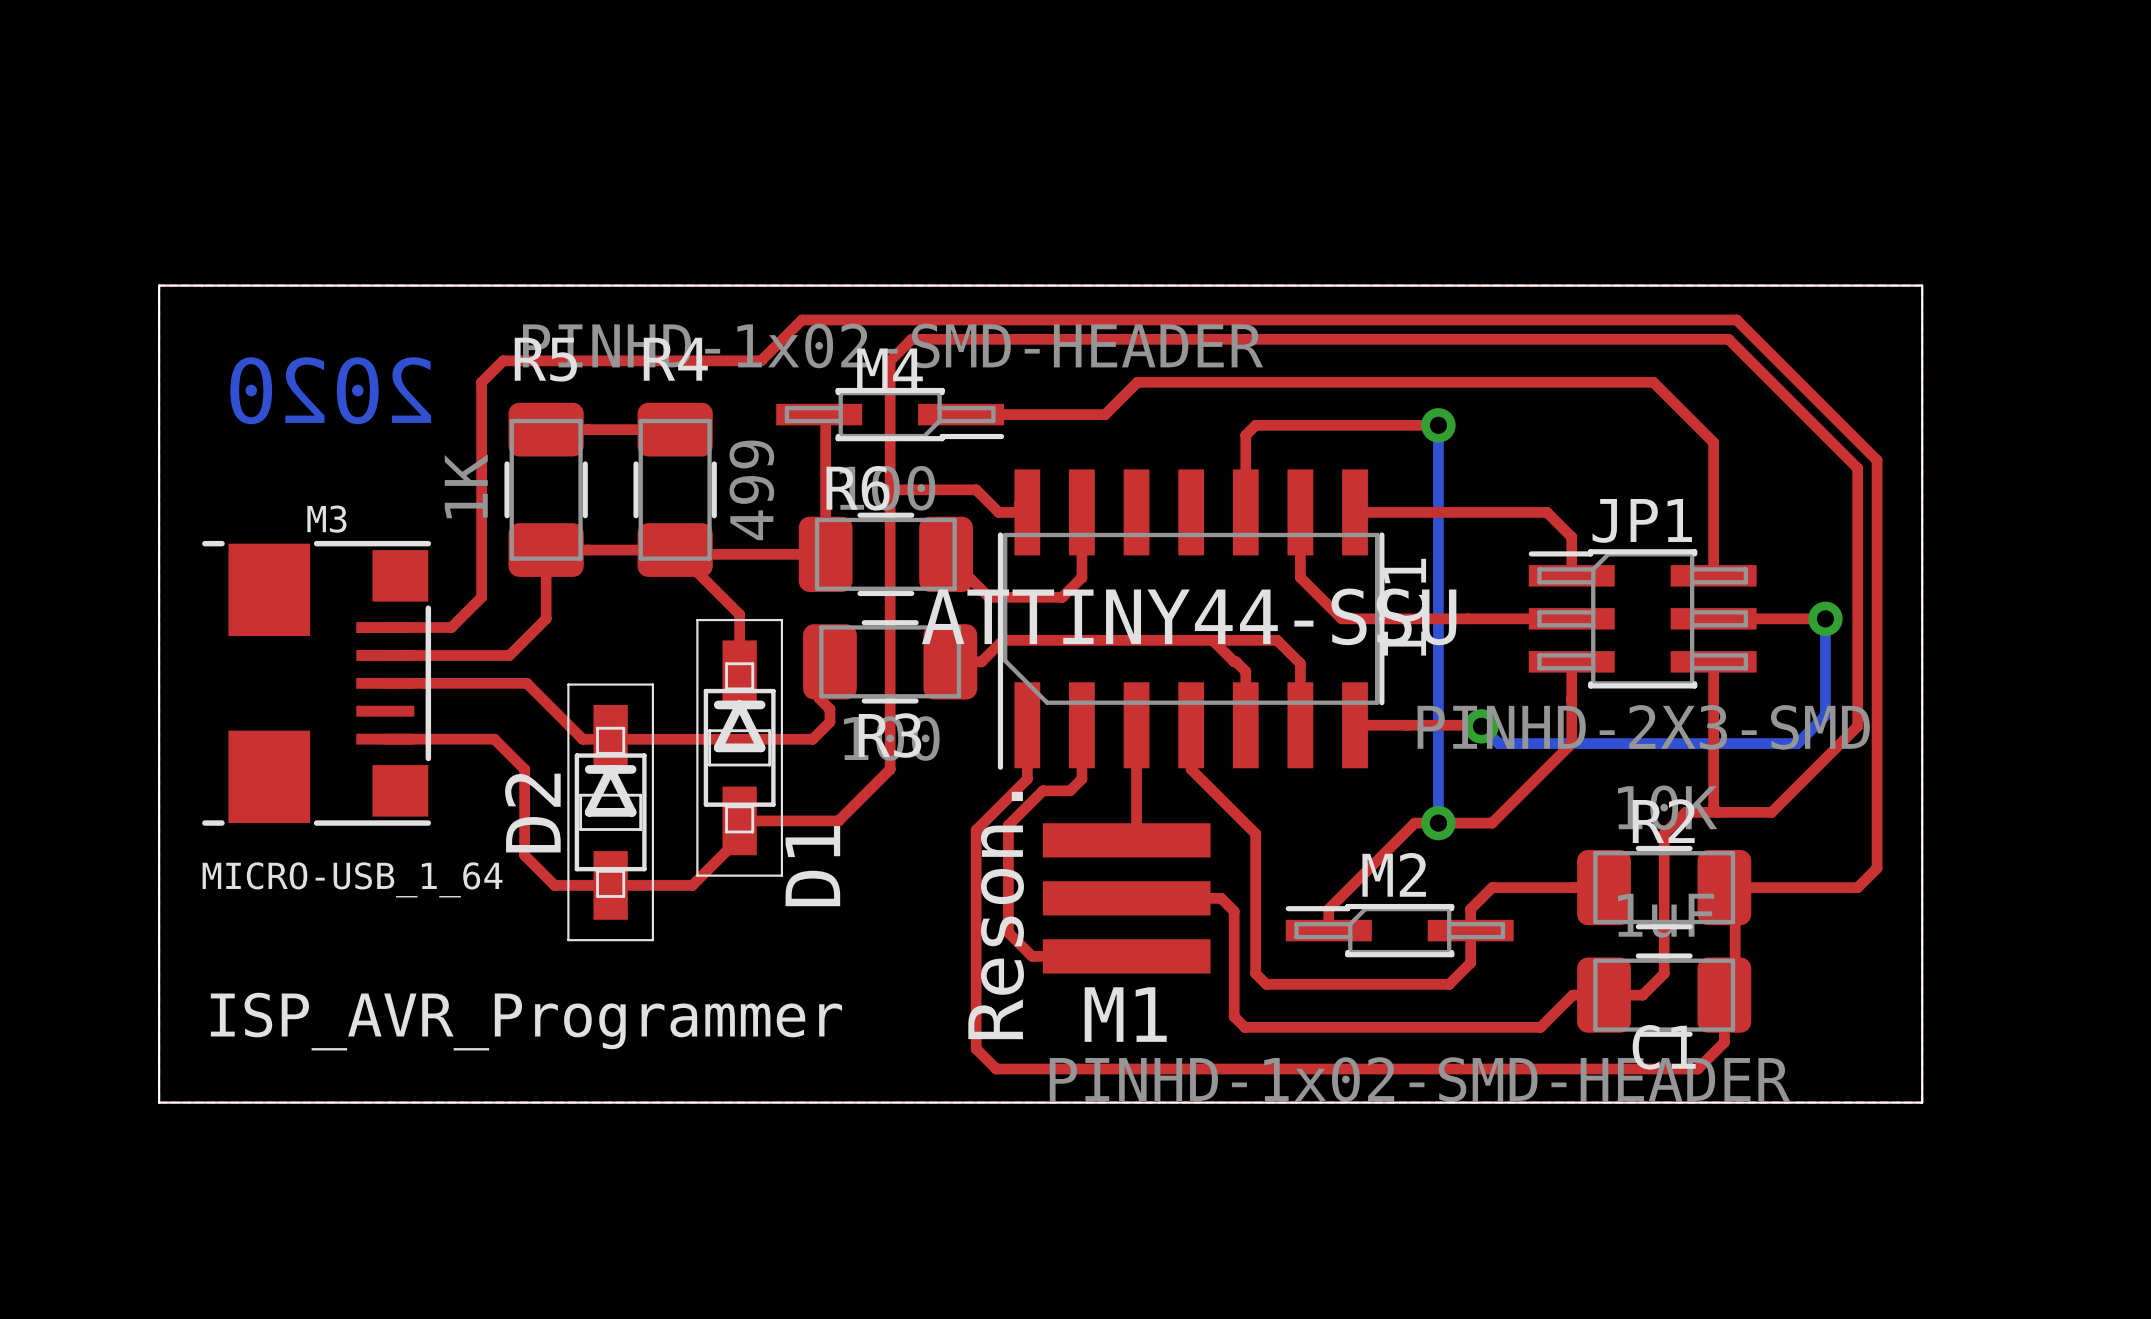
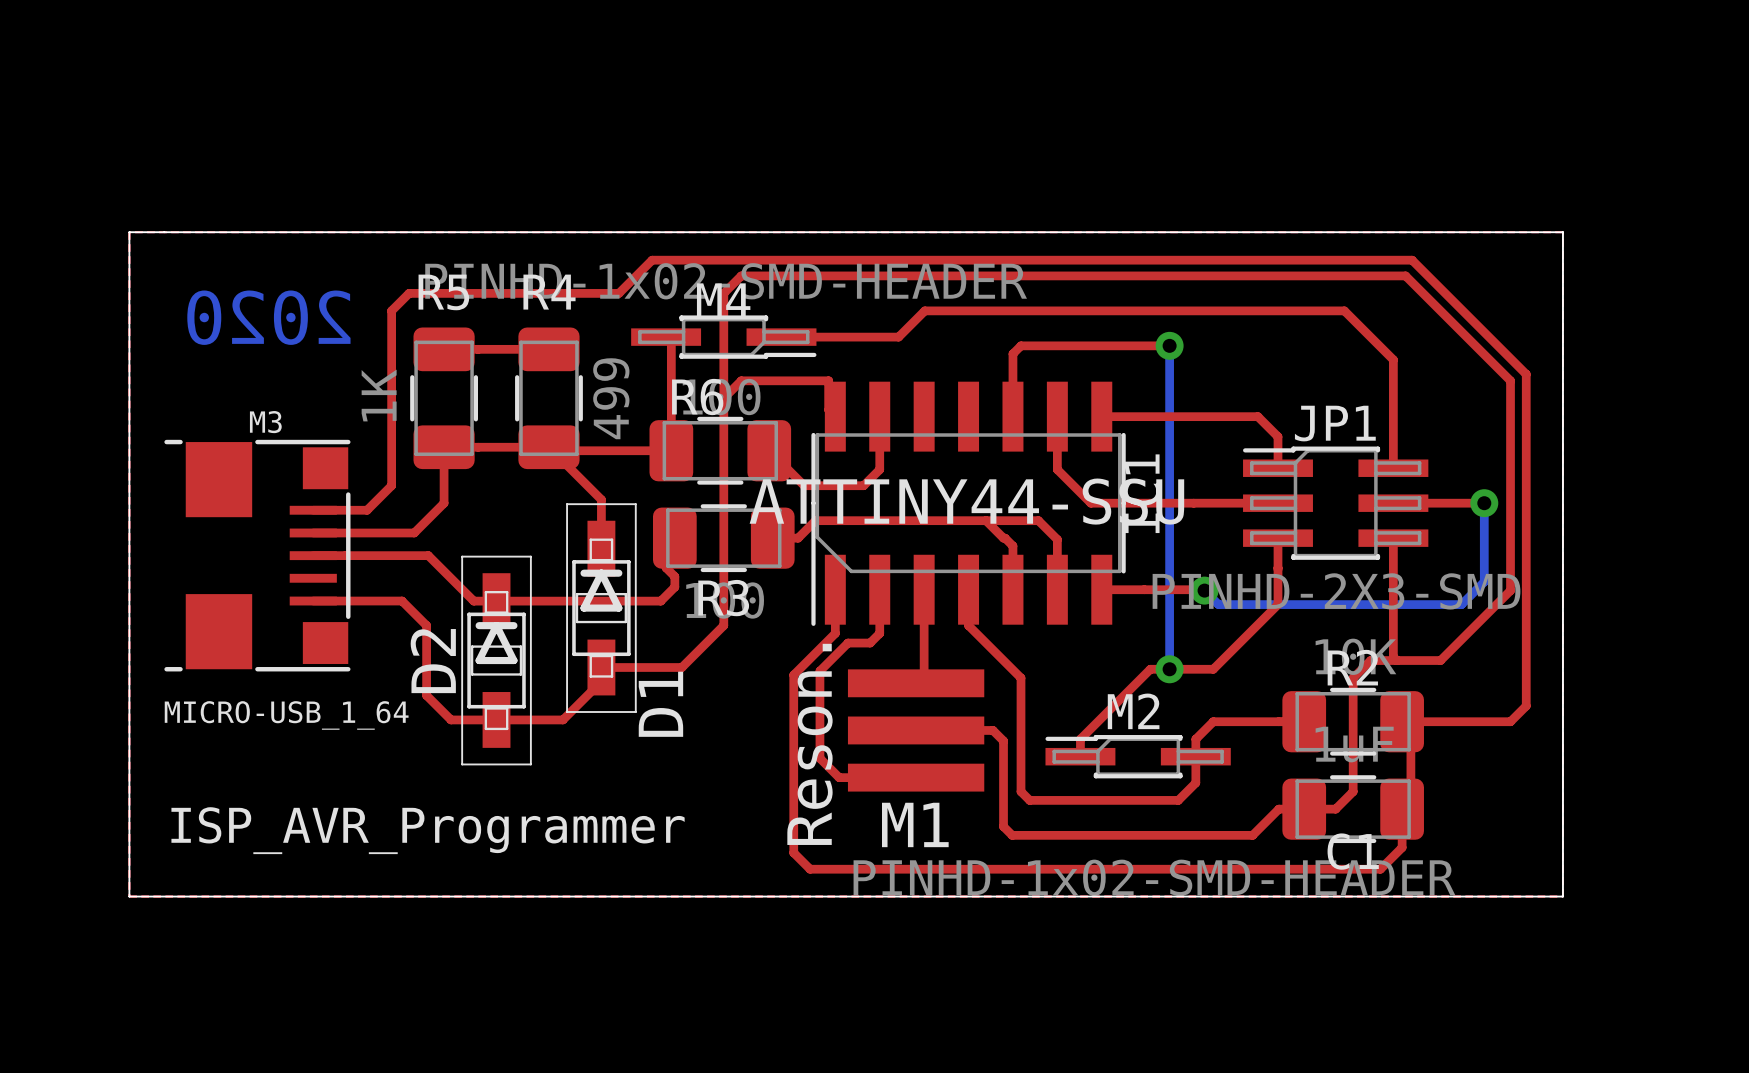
top track: (890, 489) (976, 489) (998, 512) (1027, 512) -> (723, 398) (741, 380) (828, 380) (828, 410)

